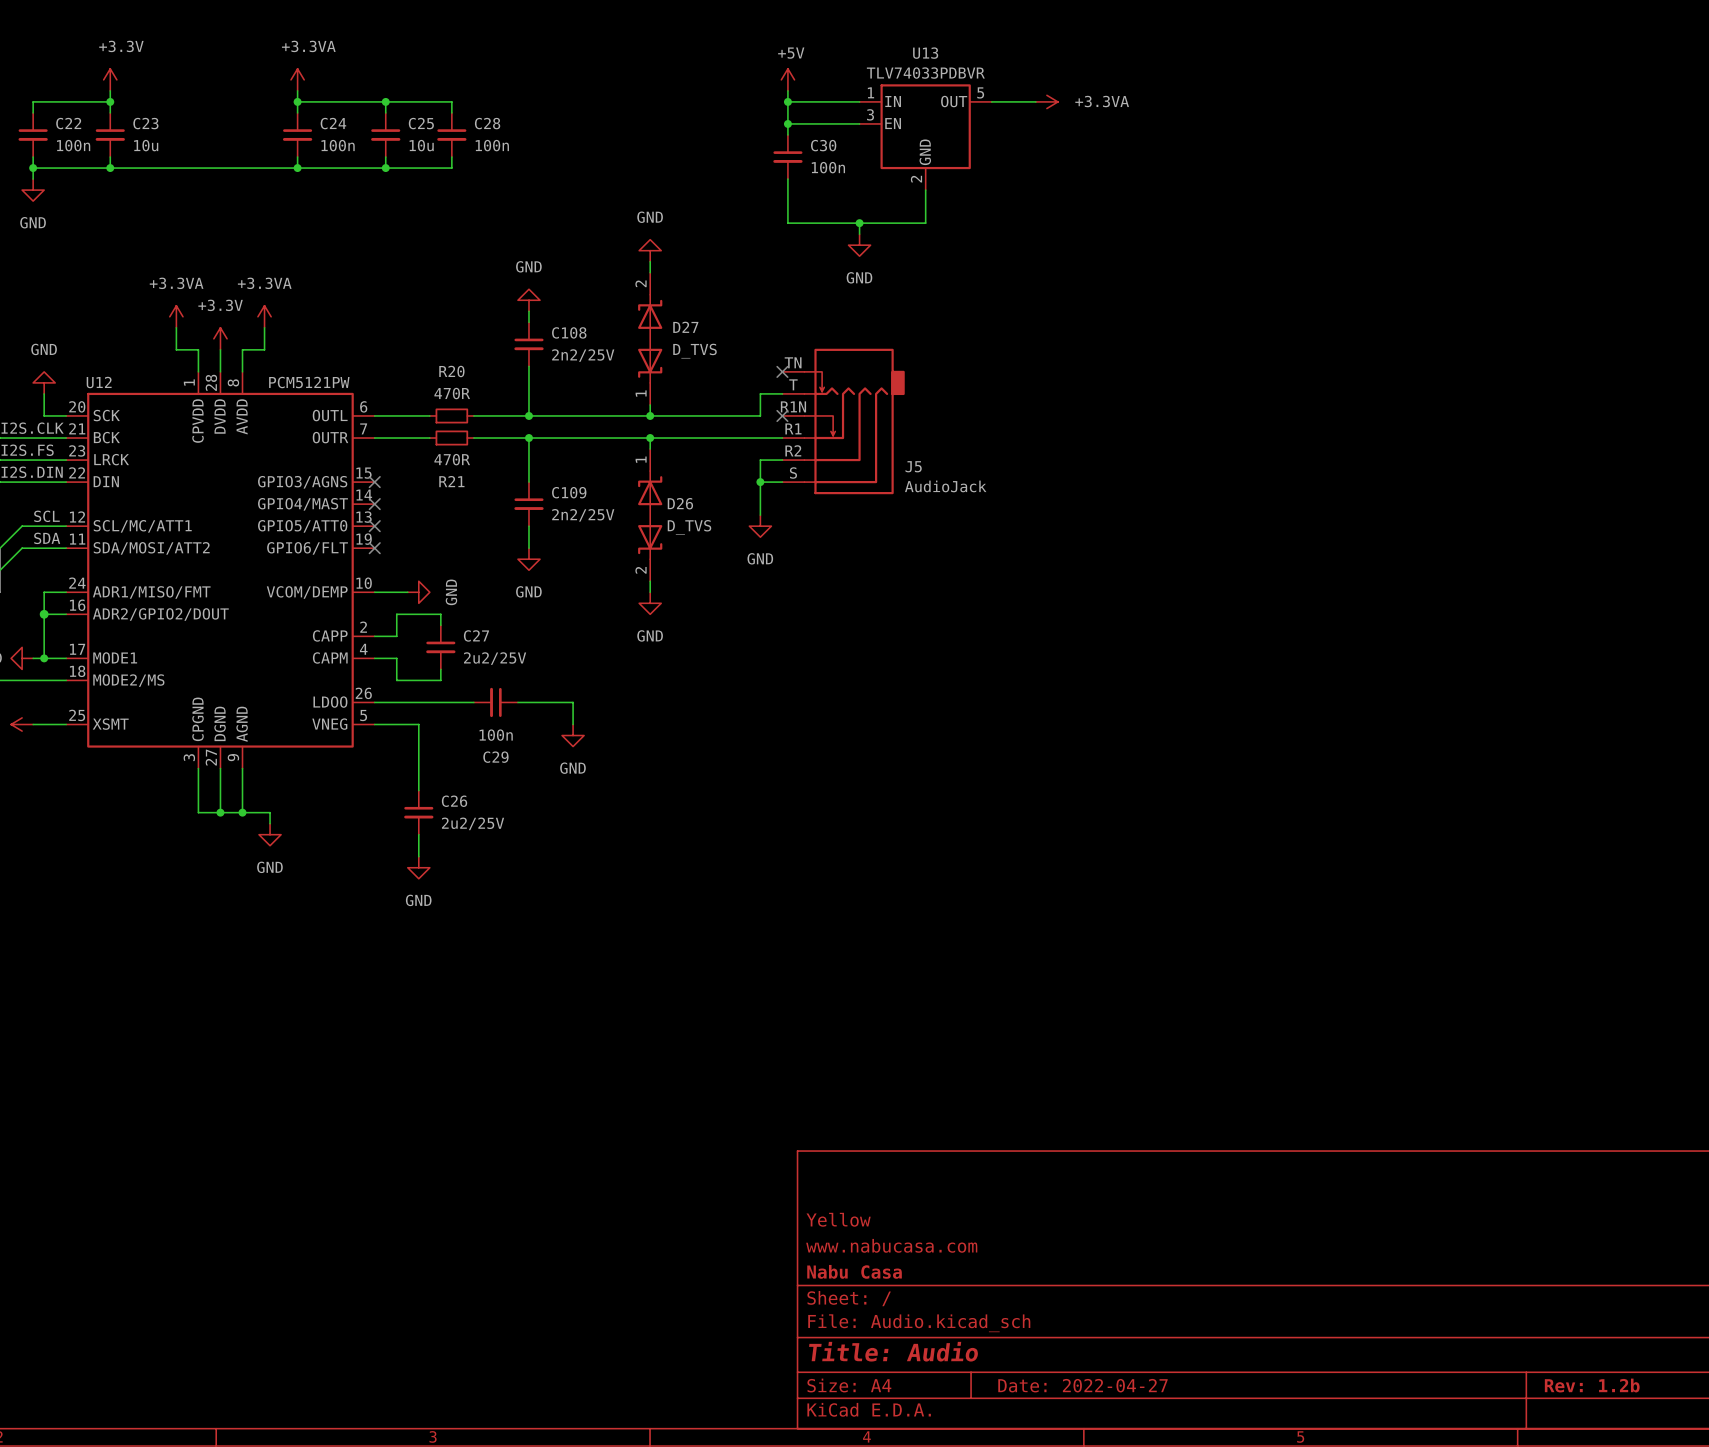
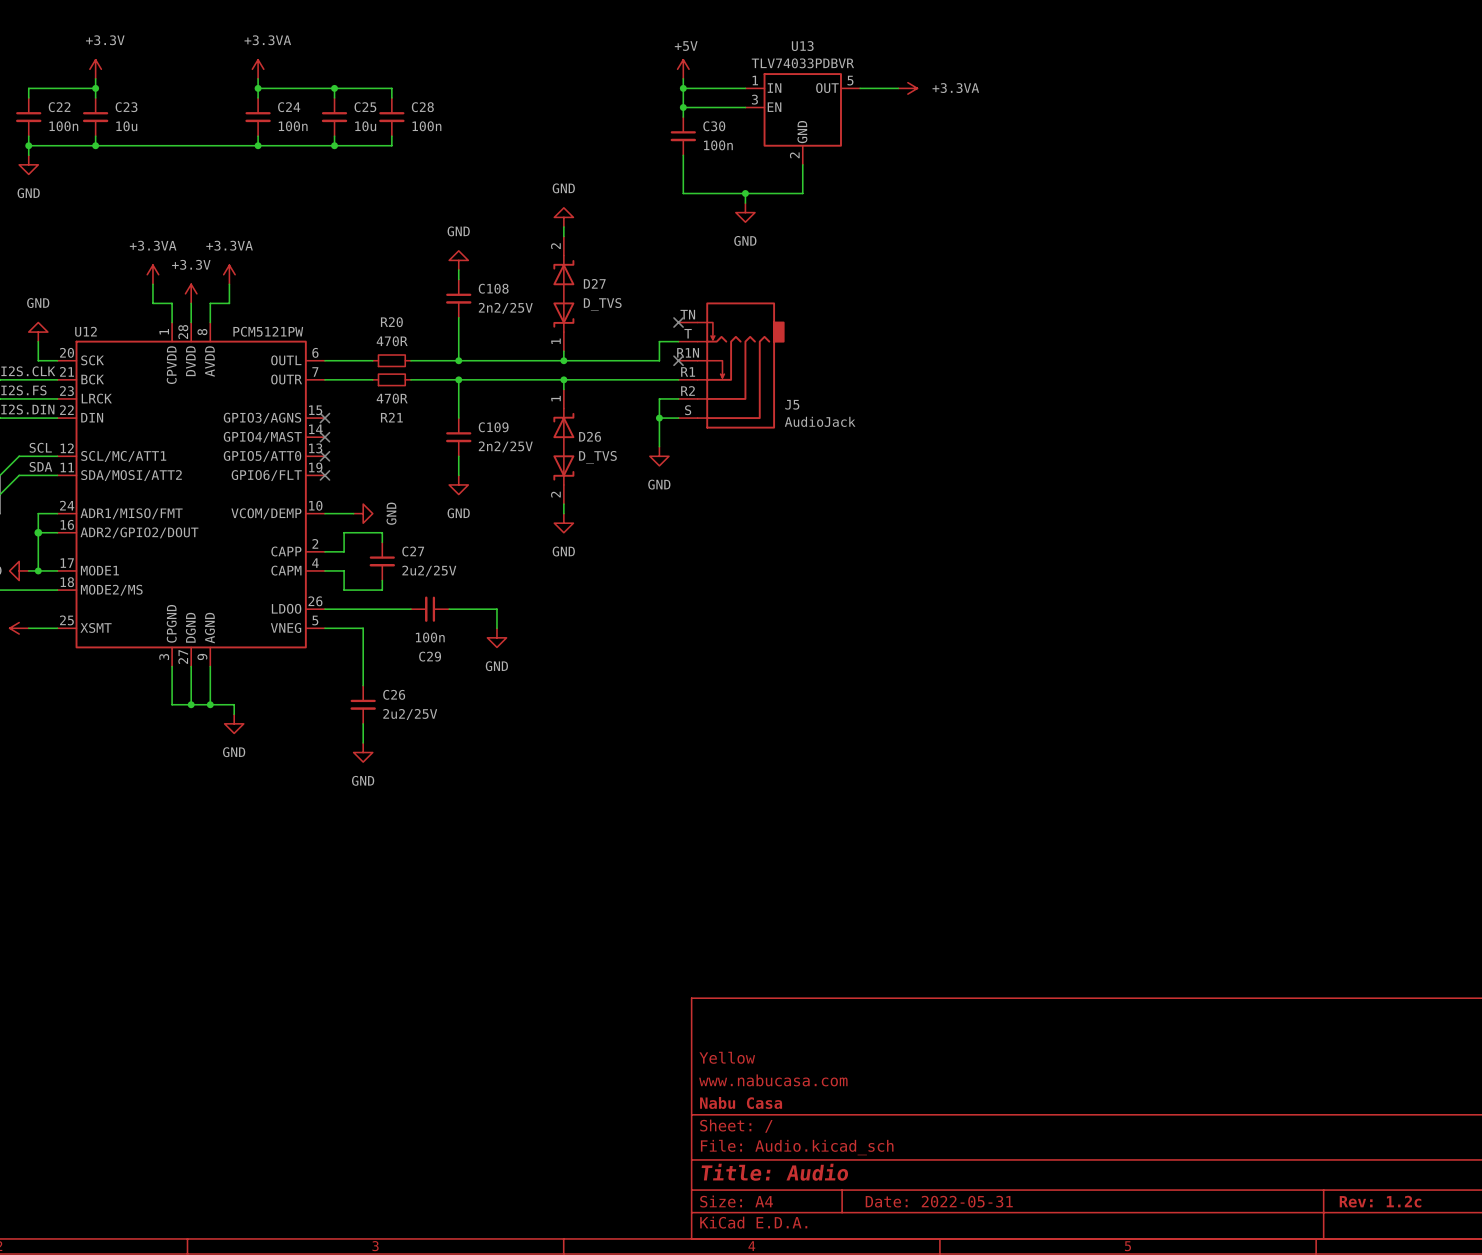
title block: Date: 2022-04-27 (1082, 1385) -> Date: 2022-05-31 (939, 1201)
title block: Rev: 1.2b (1592, 1385) -> Rev: 1.2c (1380, 1201)

